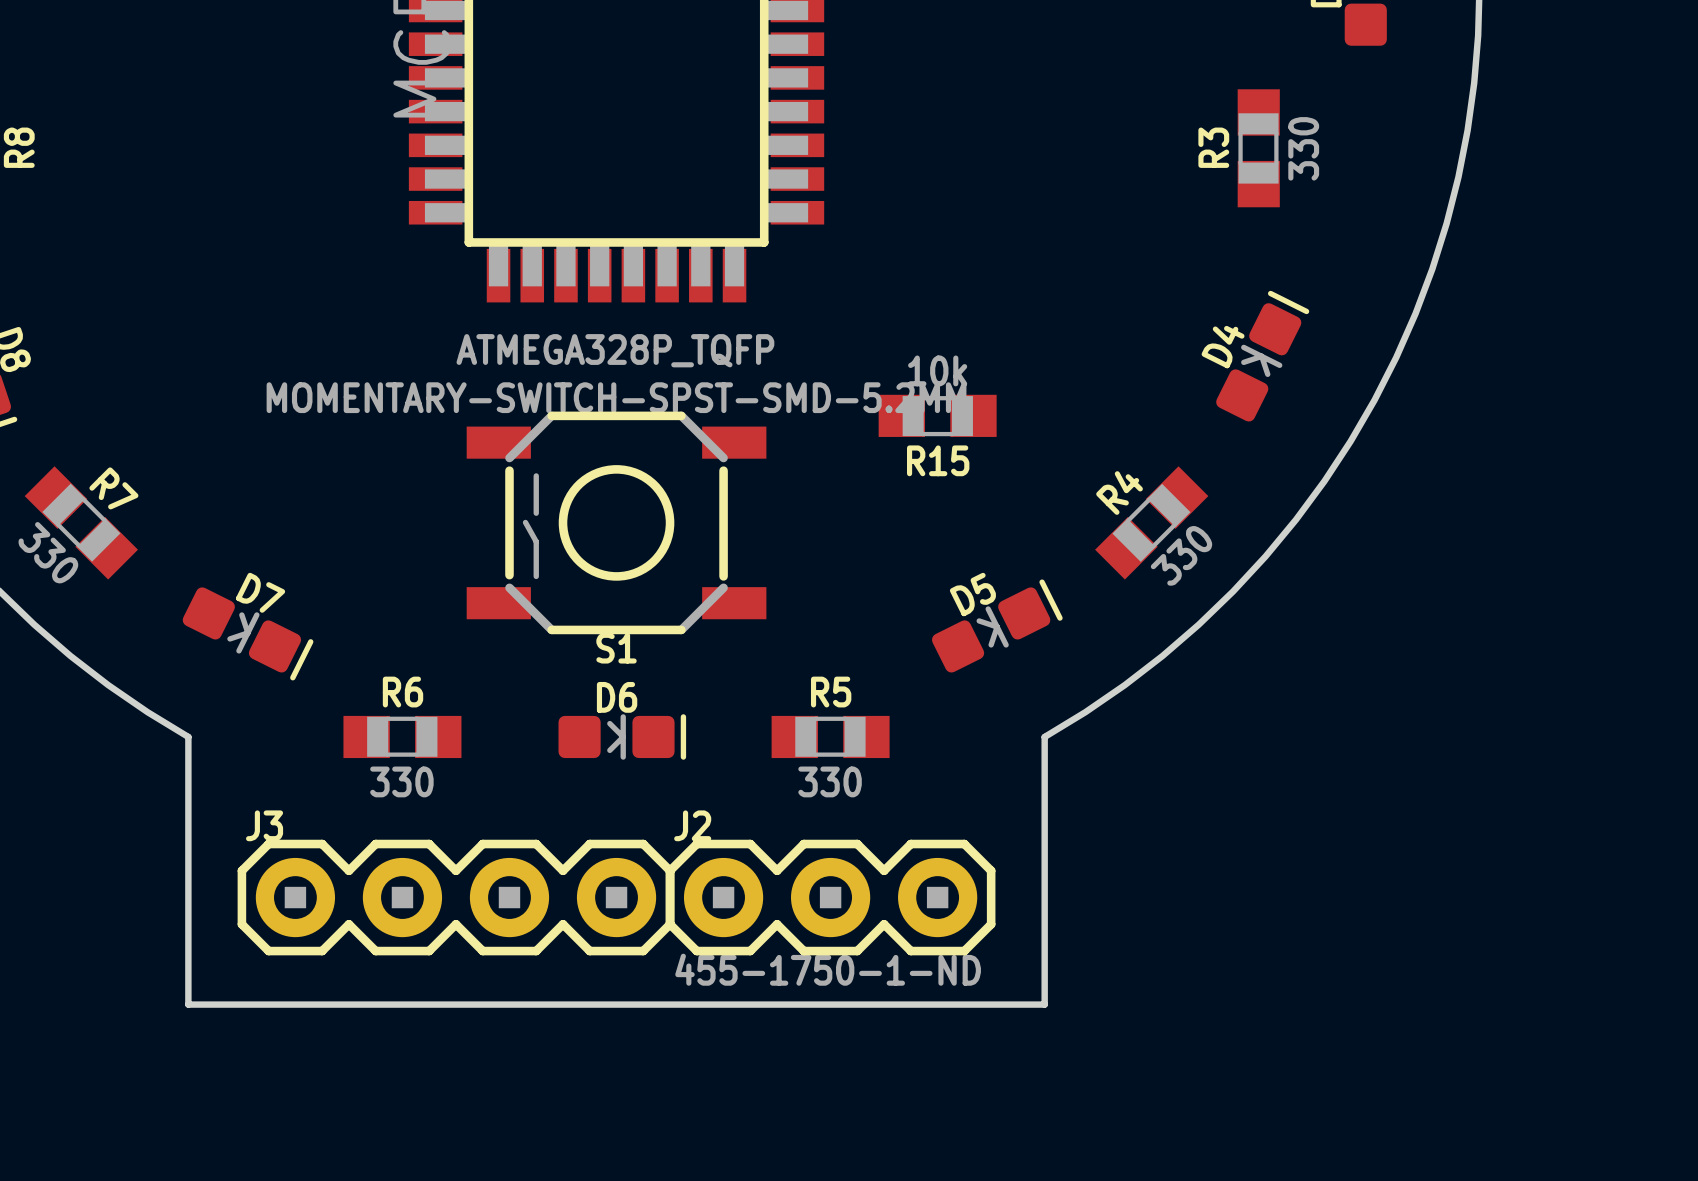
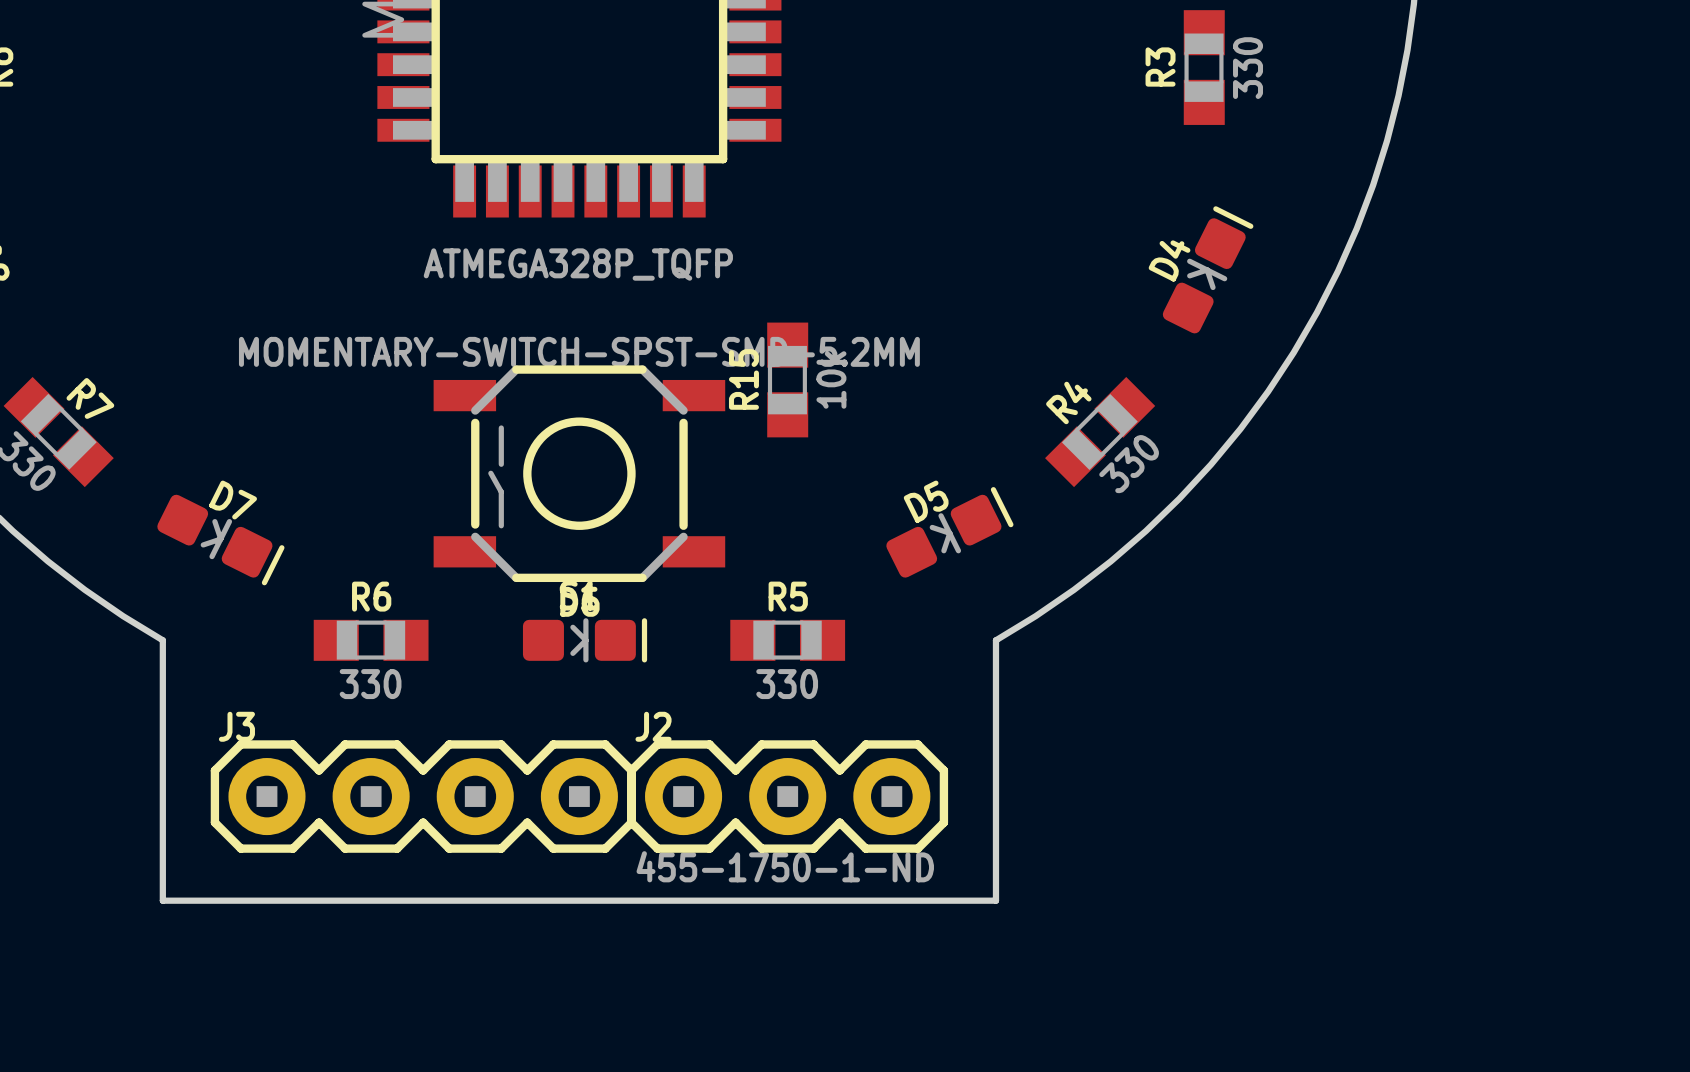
R15 rotation: 0° (937, 415) -> 90° clockwise (787, 379)
R15 position: (937, 415) -> (787, 379)
S1 position: (616, 522) -> (579, 473)

